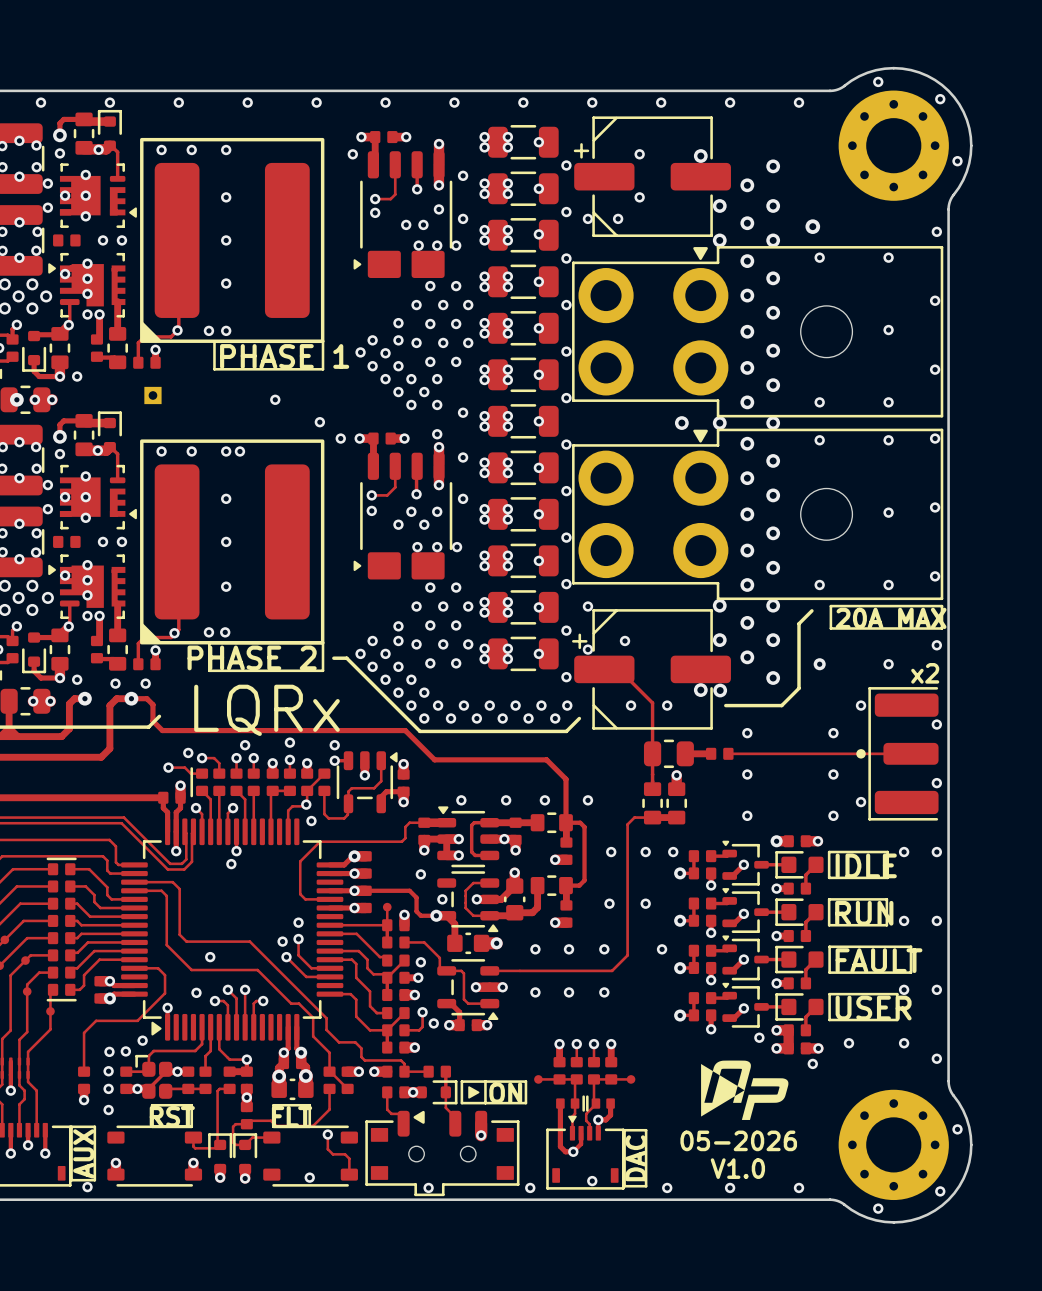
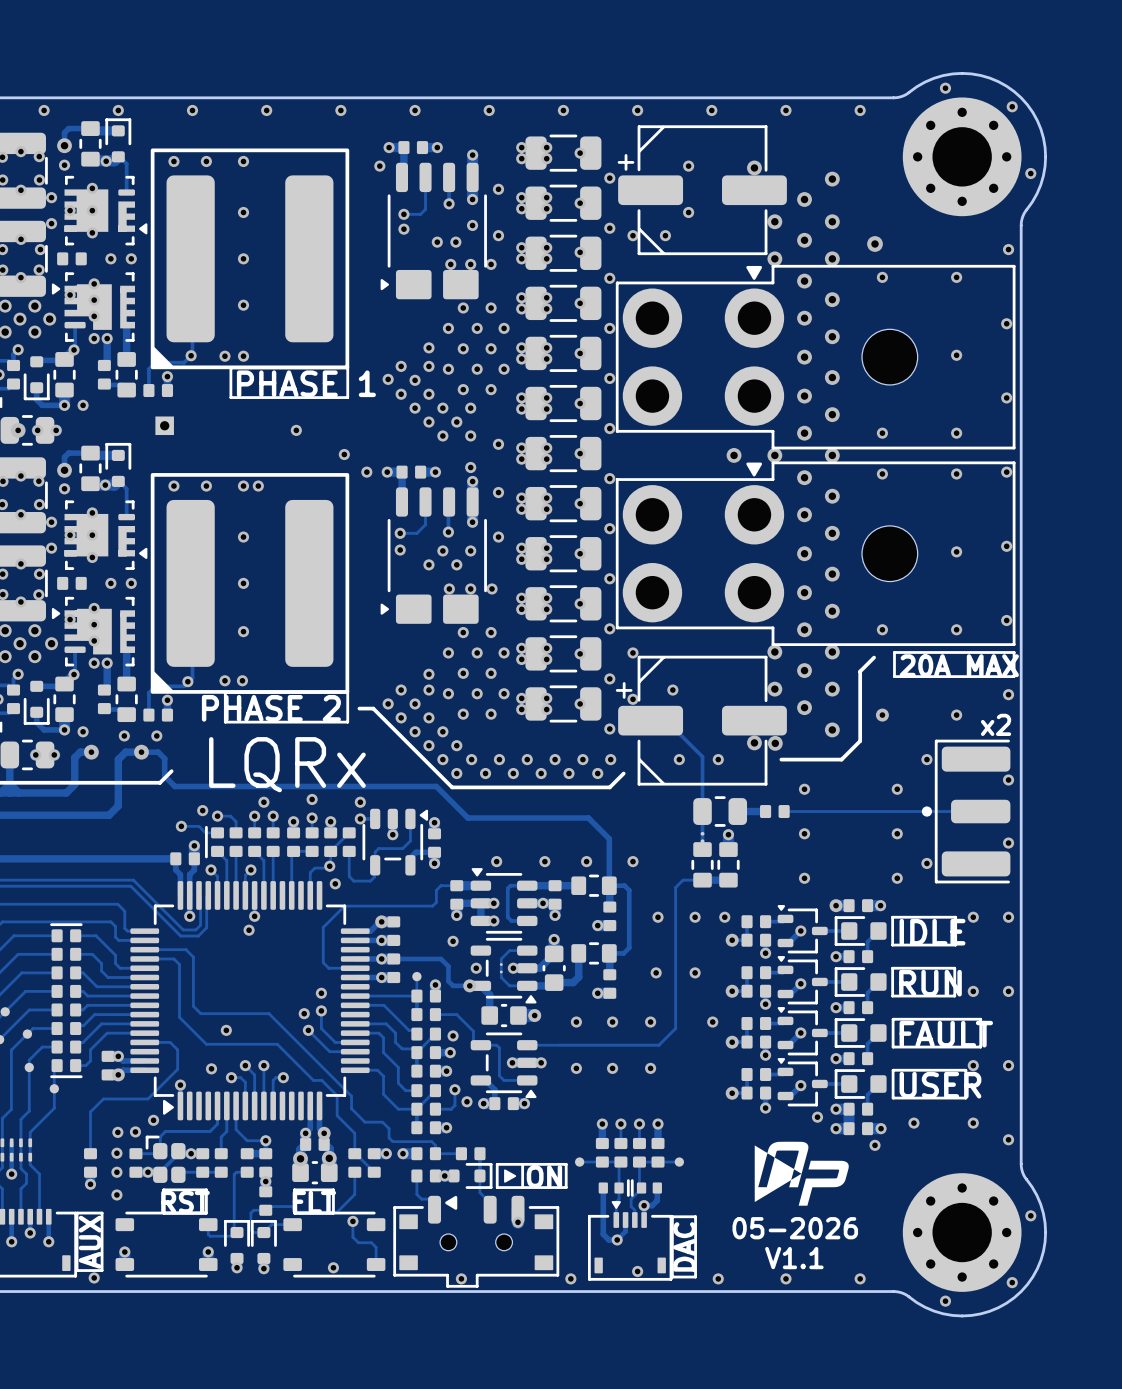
text: V1.0 (737, 1168) -> V1.1 (794, 1258)

